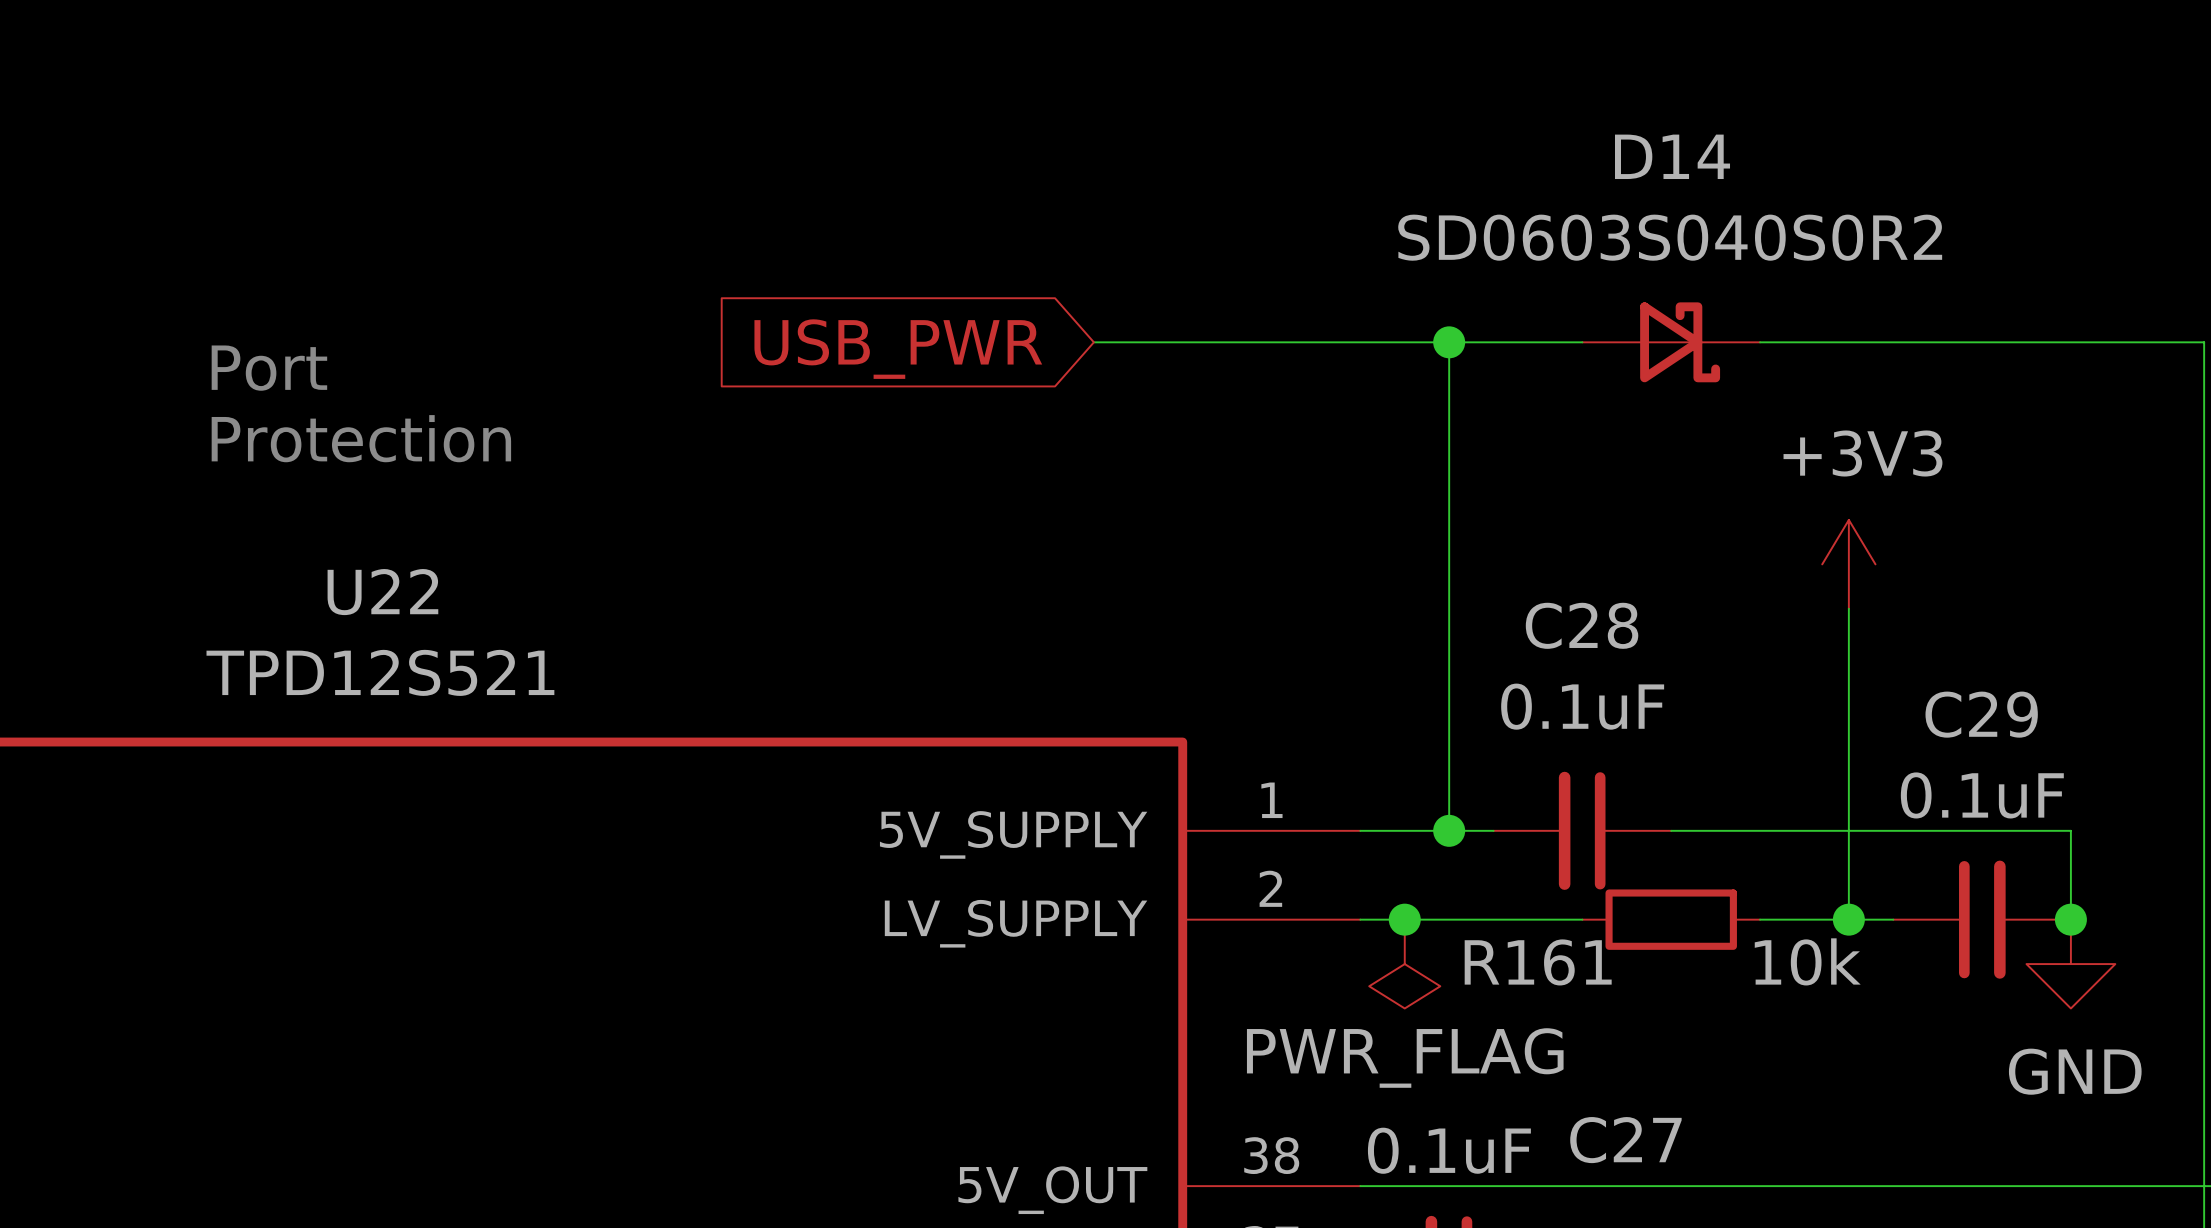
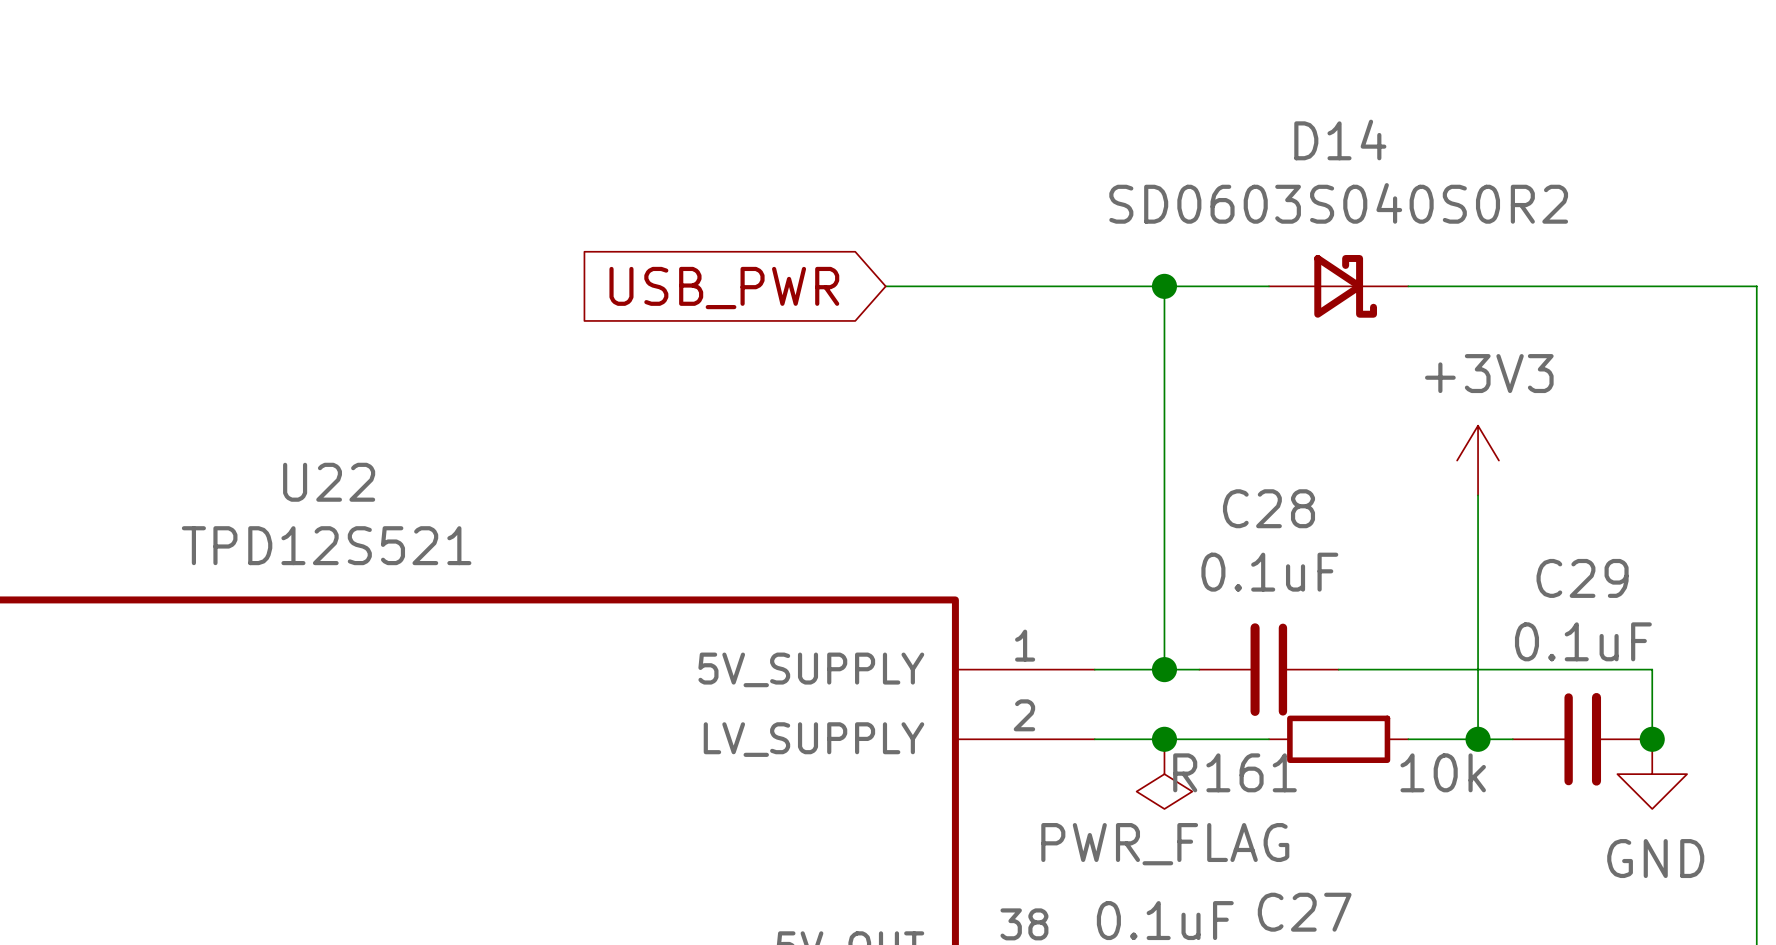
text: Port (269, 368) -> none
text: Protection (361, 438) -> none
junction position: (1404, 919) -> (1164, 739)
power symbol position: PWR_FLAG (1404, 964) -> PWR_FLAG (1164, 774)

